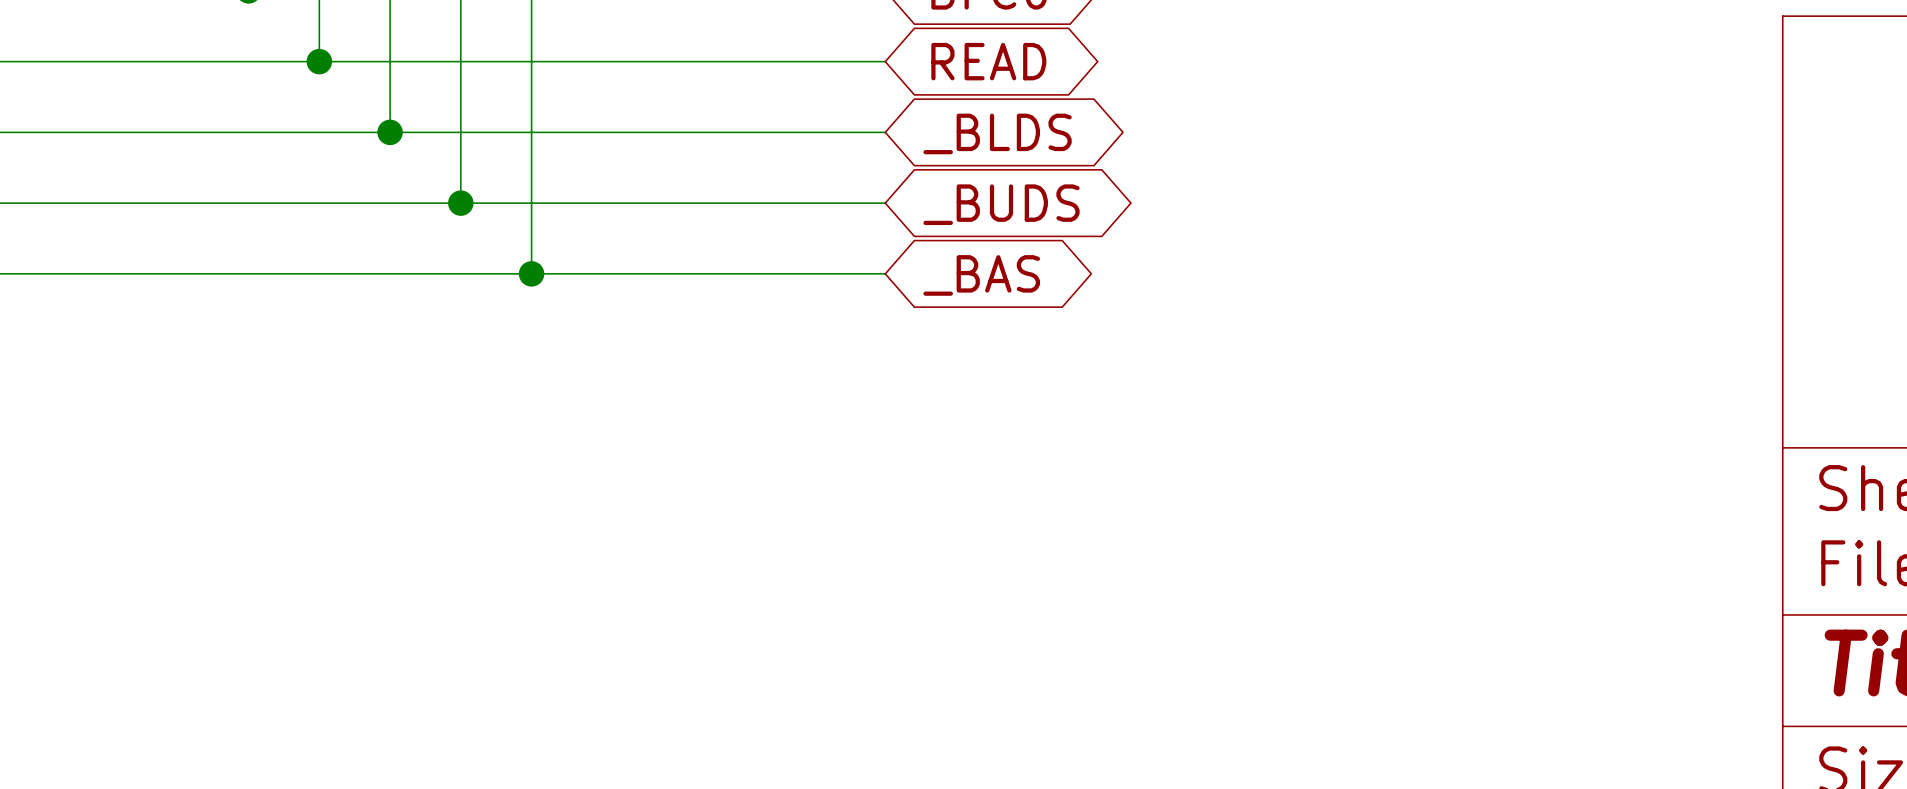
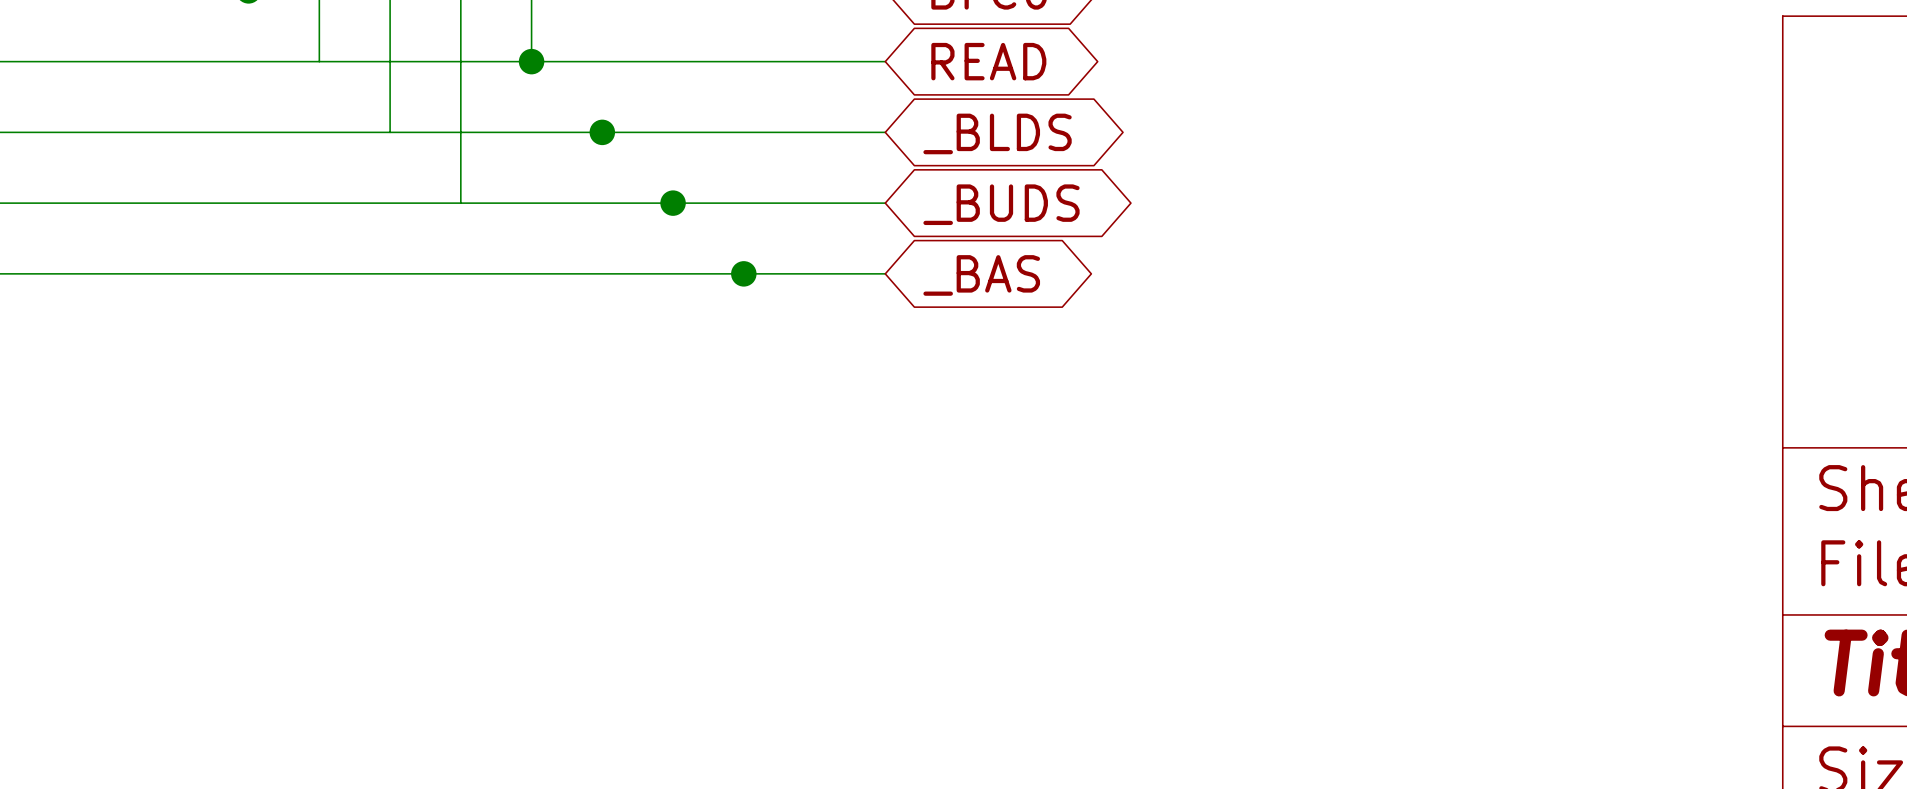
junction: (319, 61) -> none
wire: (531, 61) (531, 273) -> none
junction: none -> (531, 61)
junction: (390, 132) -> none
junction: none -> (602, 132)
junction: (460, 203) -> none
junction: none -> (673, 203)
junction: (531, 273) -> none
junction: none -> (743, 273)

